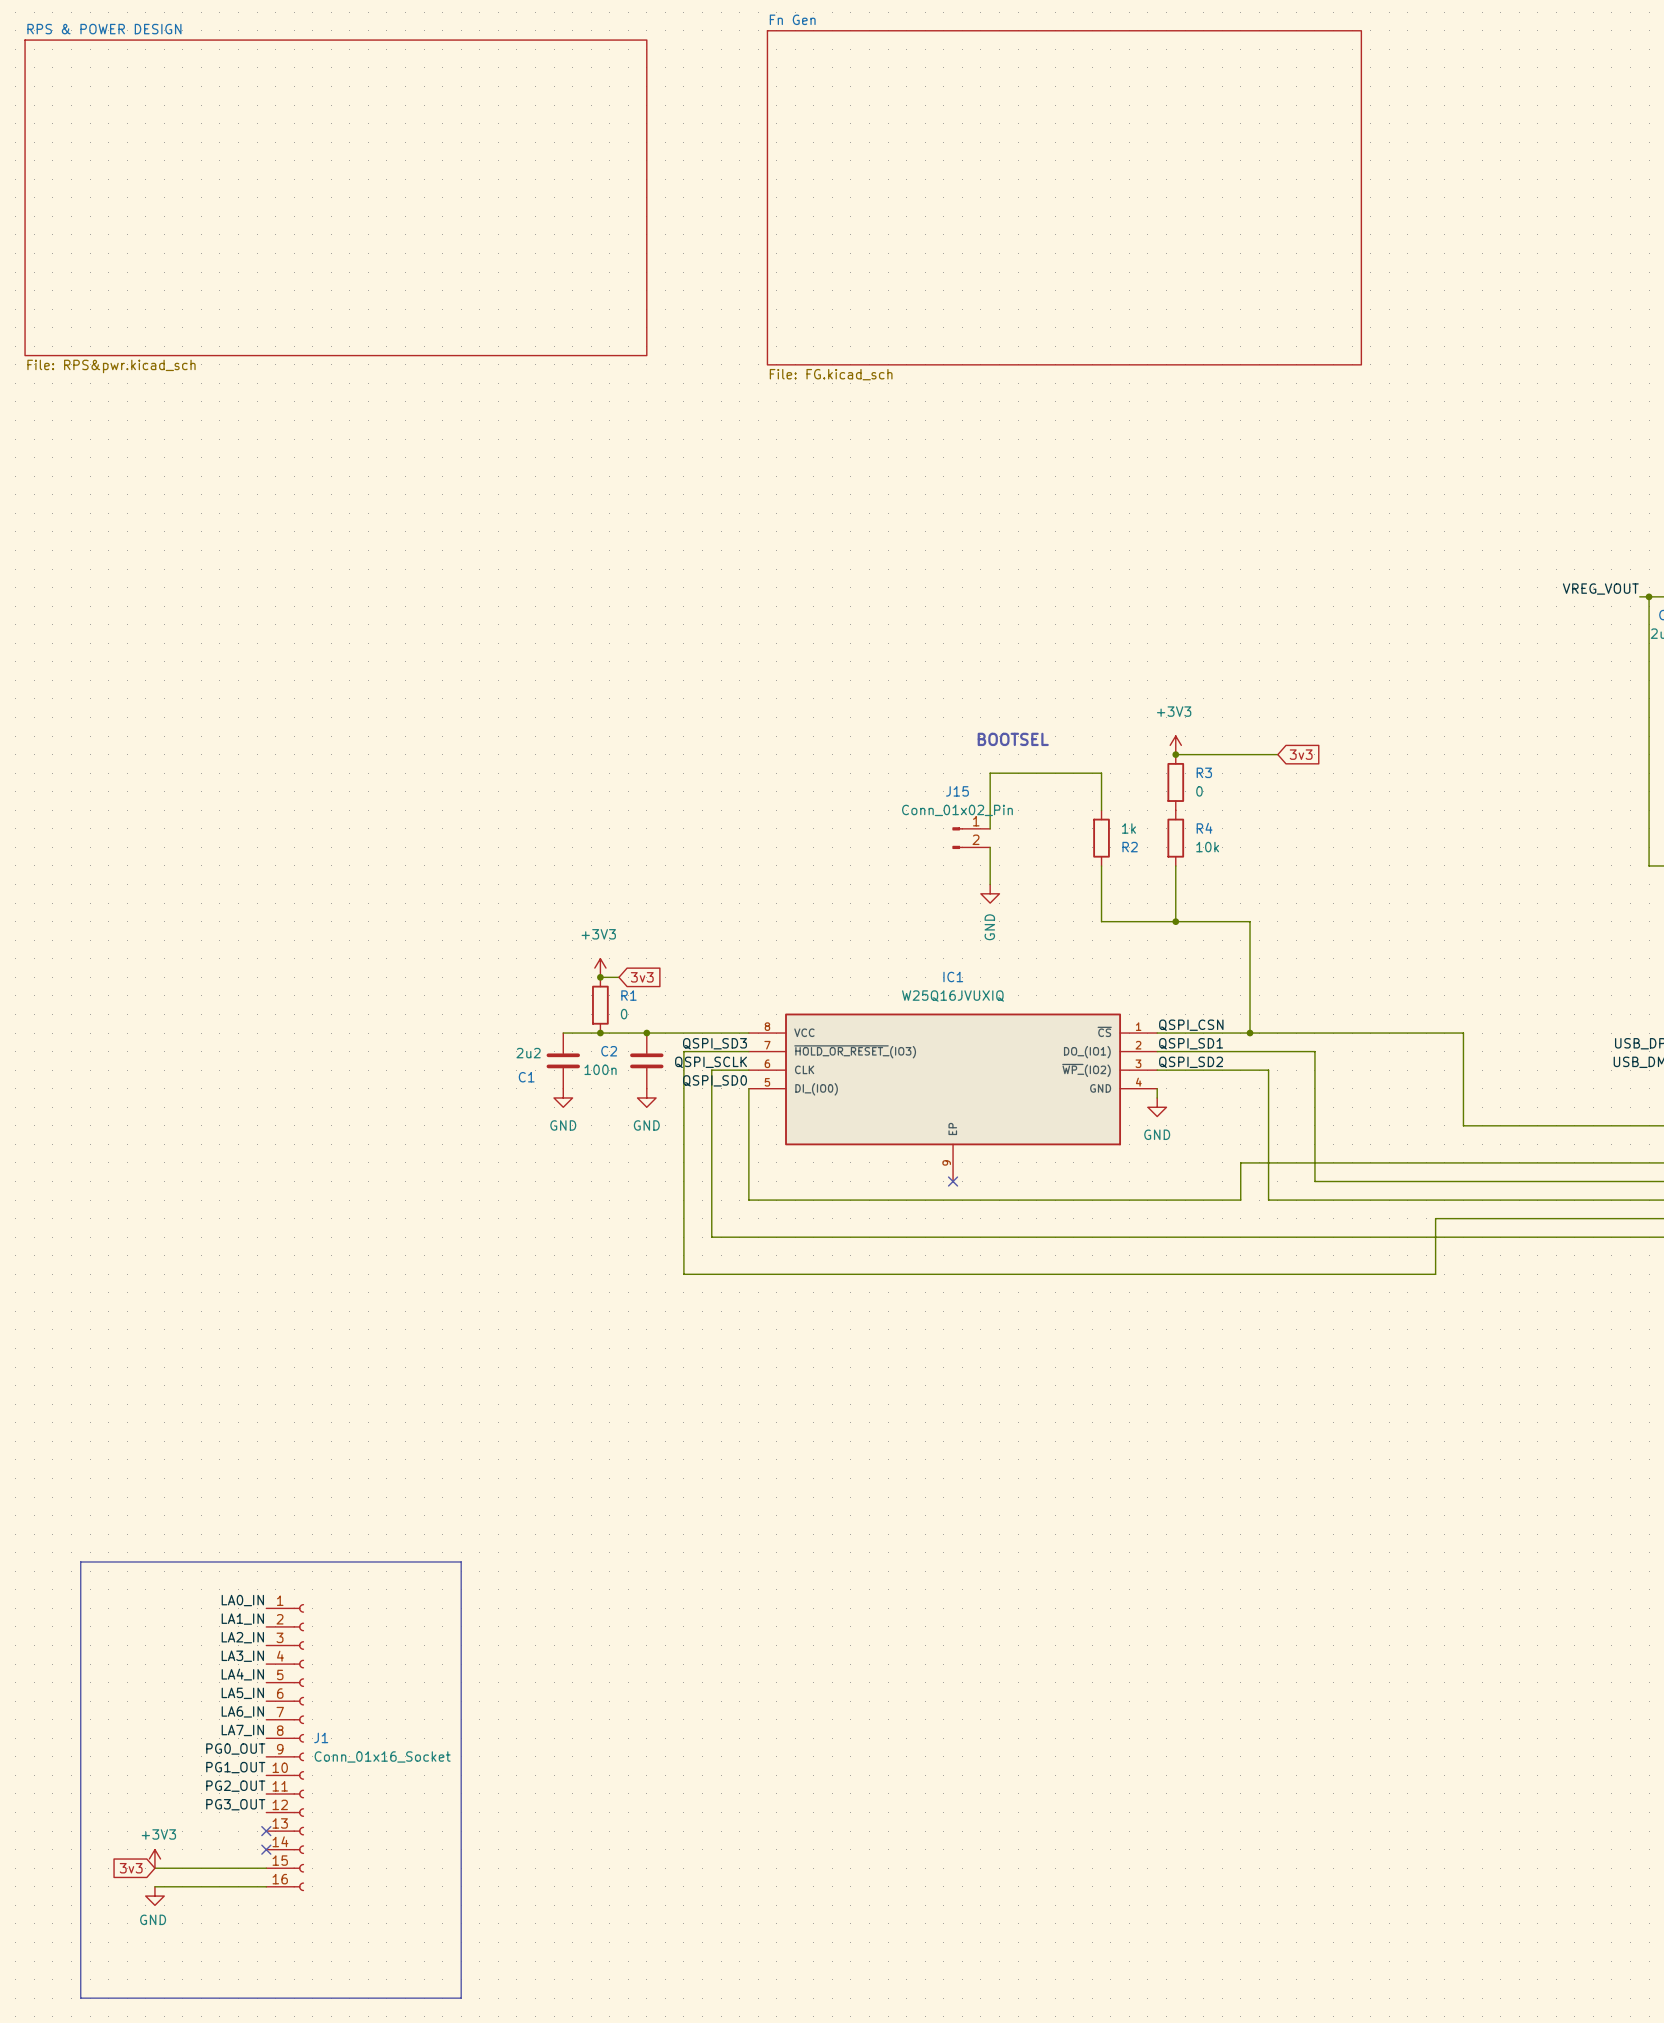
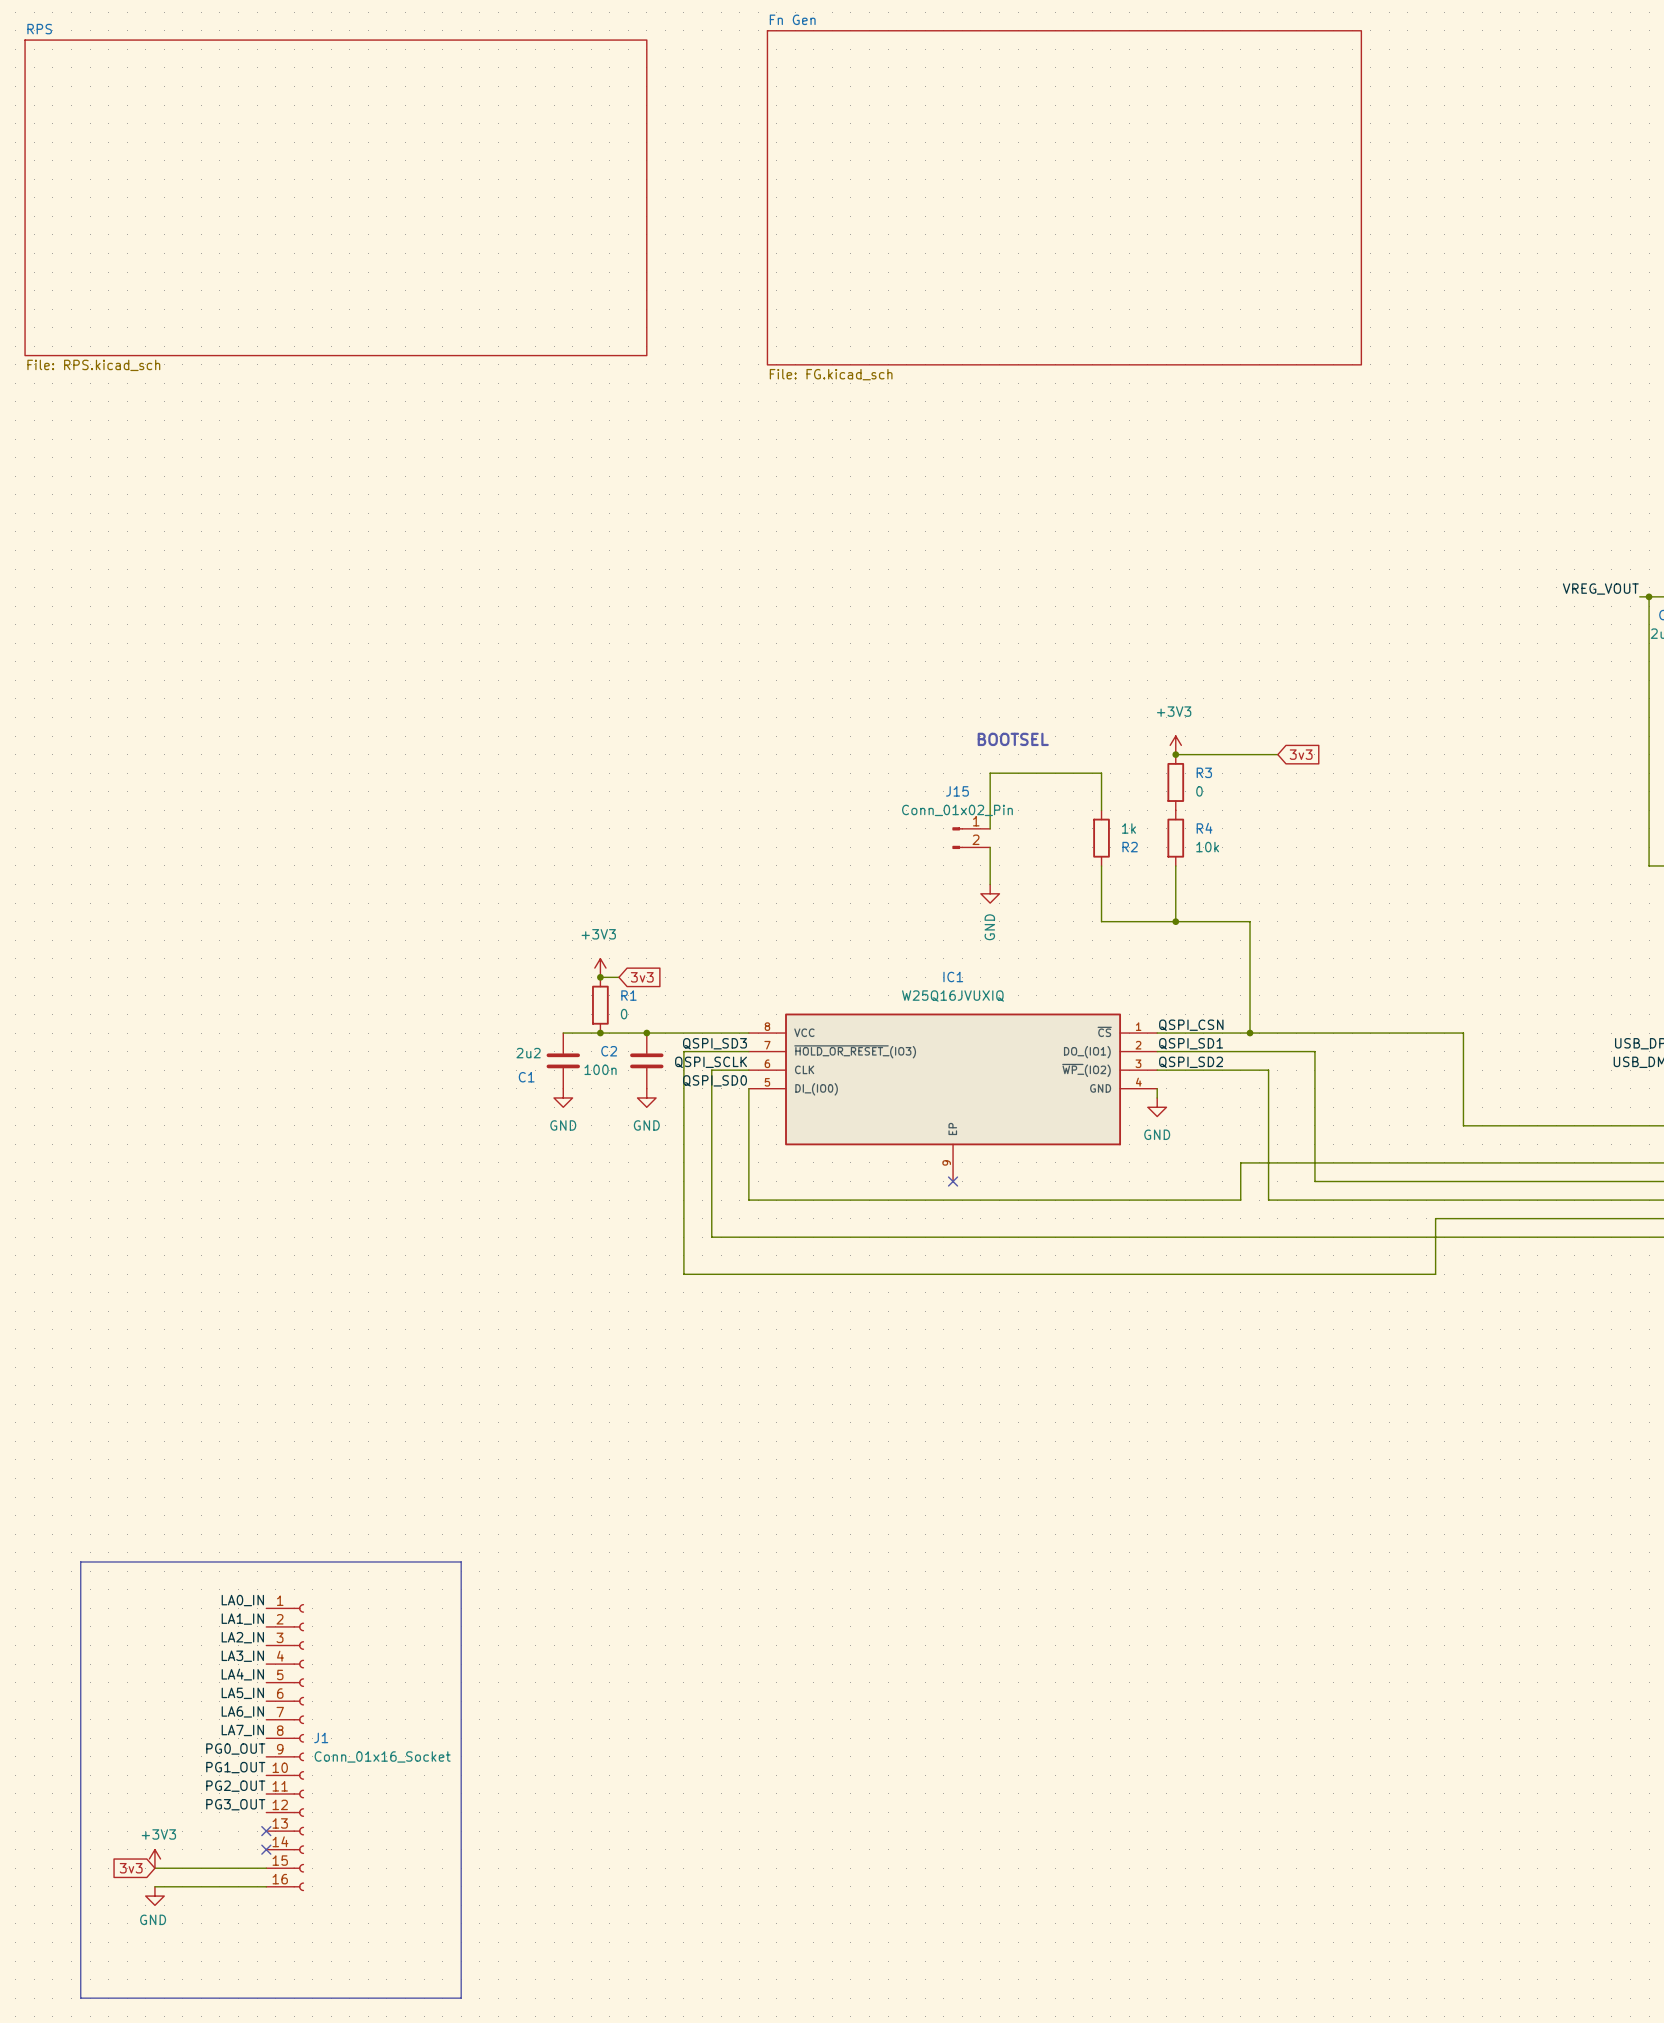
sheet RPS & POWER DESIGN name: RPS & POWER DESIGN (104, 29) -> RPS (39, 29)
sheet RPS & POWER DESIGN value: File: RPS&pwr.kicad_sch (111, 366) -> File: RPS.kicad_sch (93, 365)

